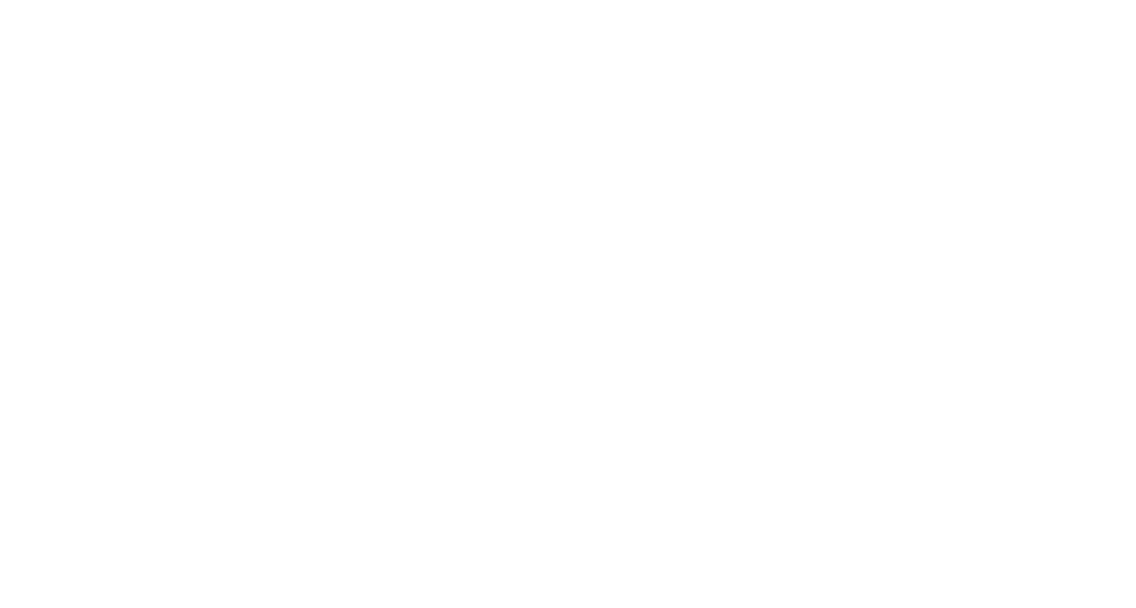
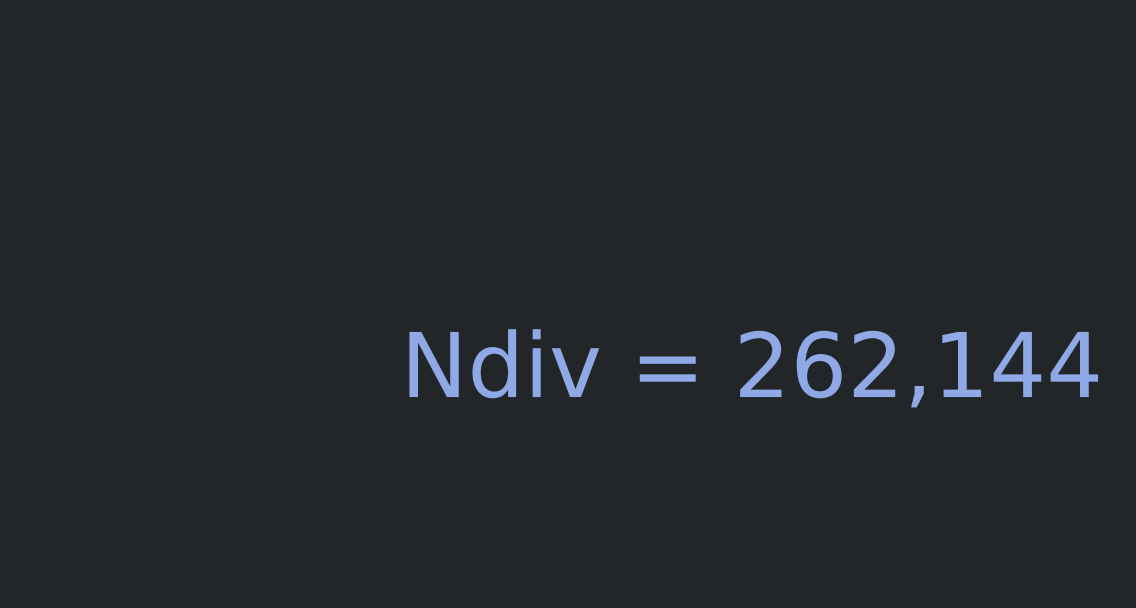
text: none -> Ndiv = 262,144 (753, 368)

